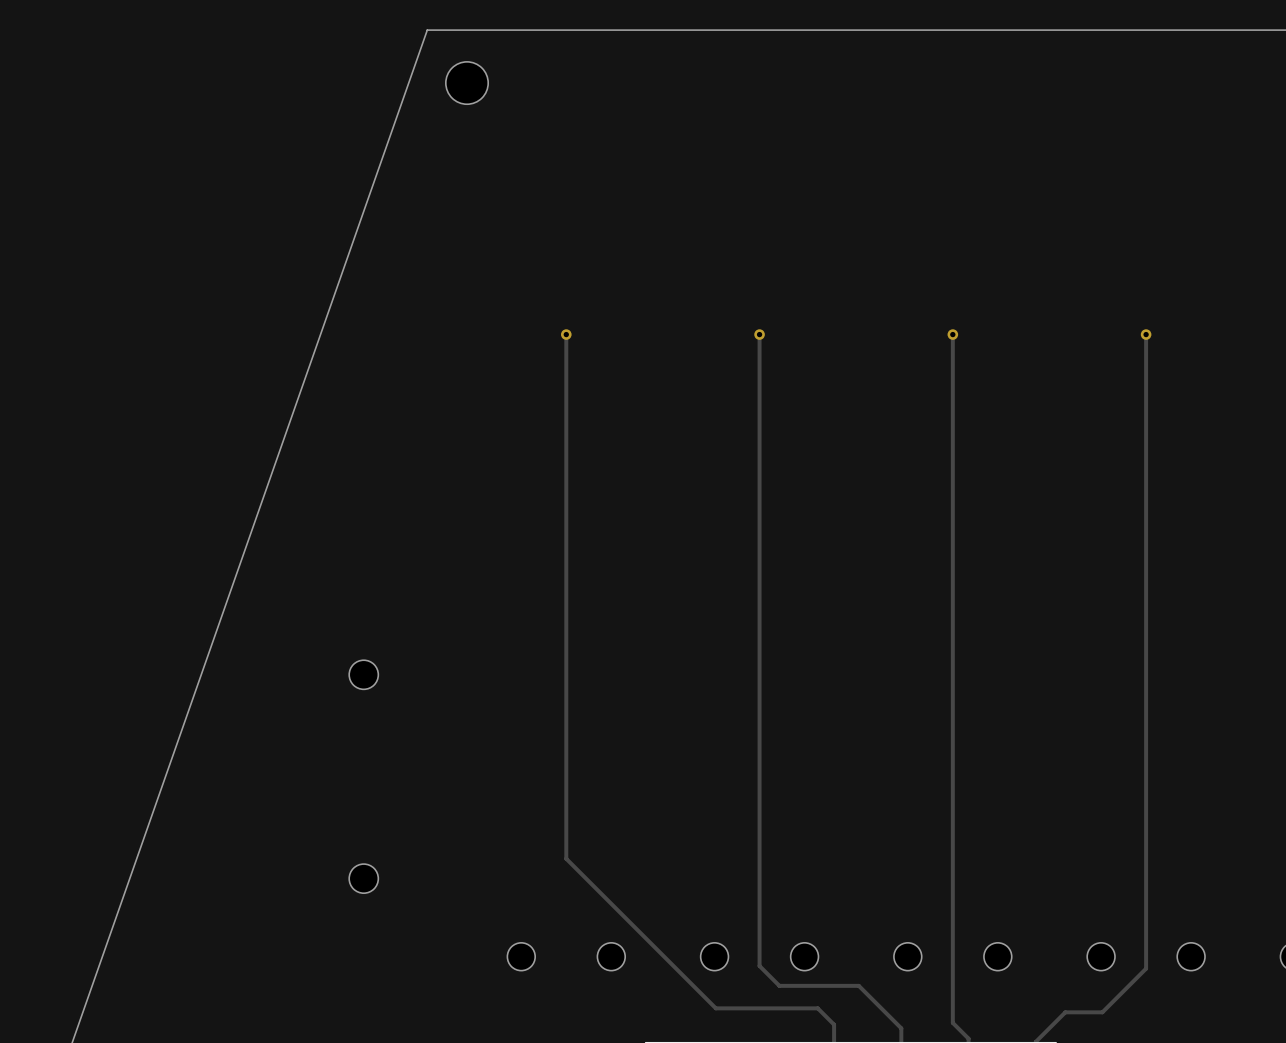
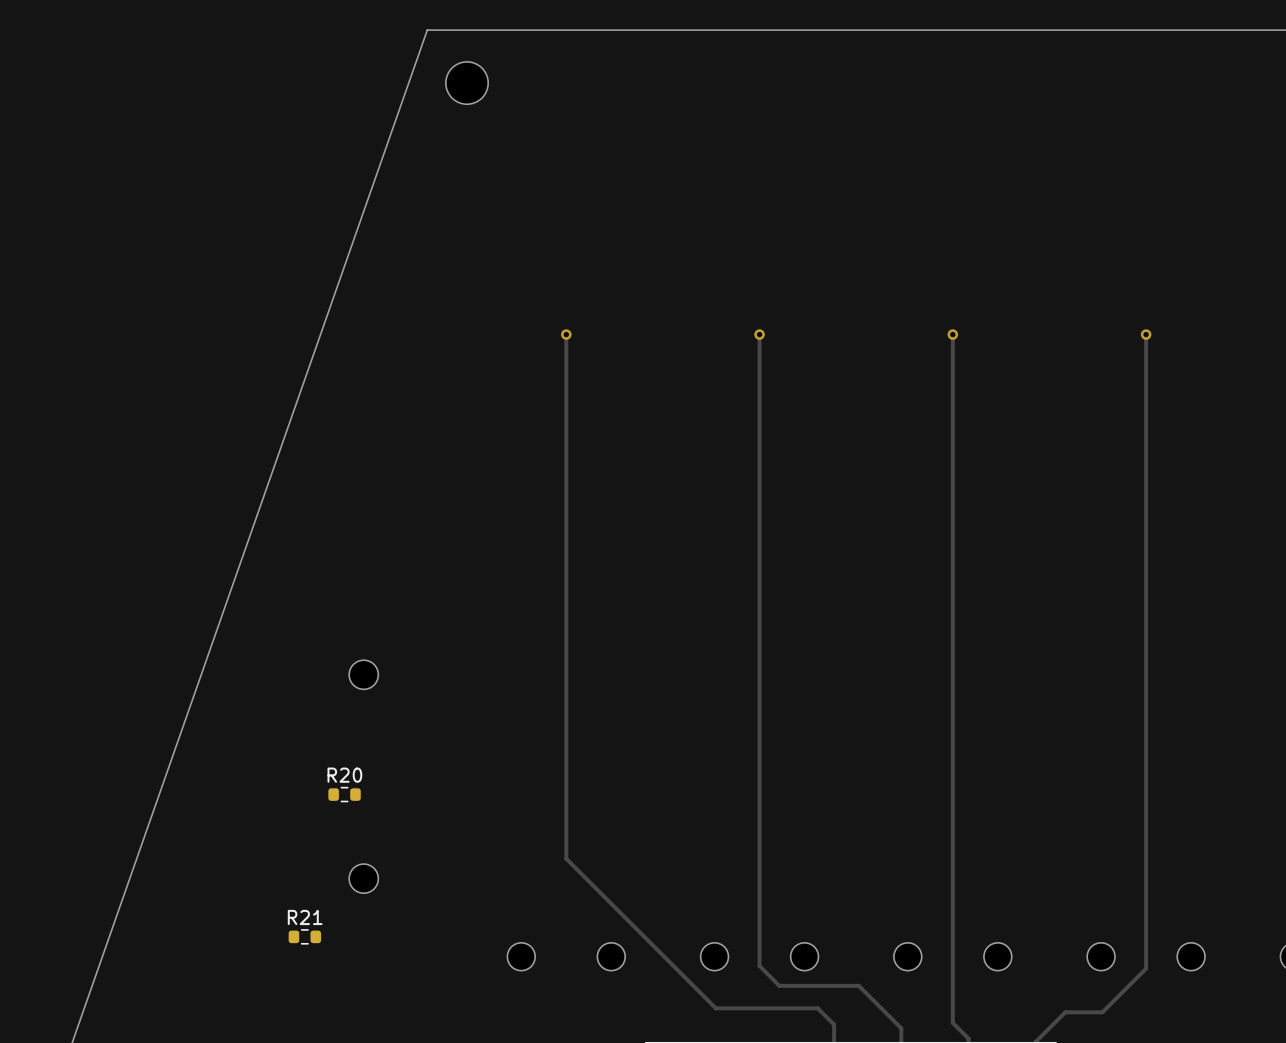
R20: none -> (344, 794)
R21: none -> (304, 936)

